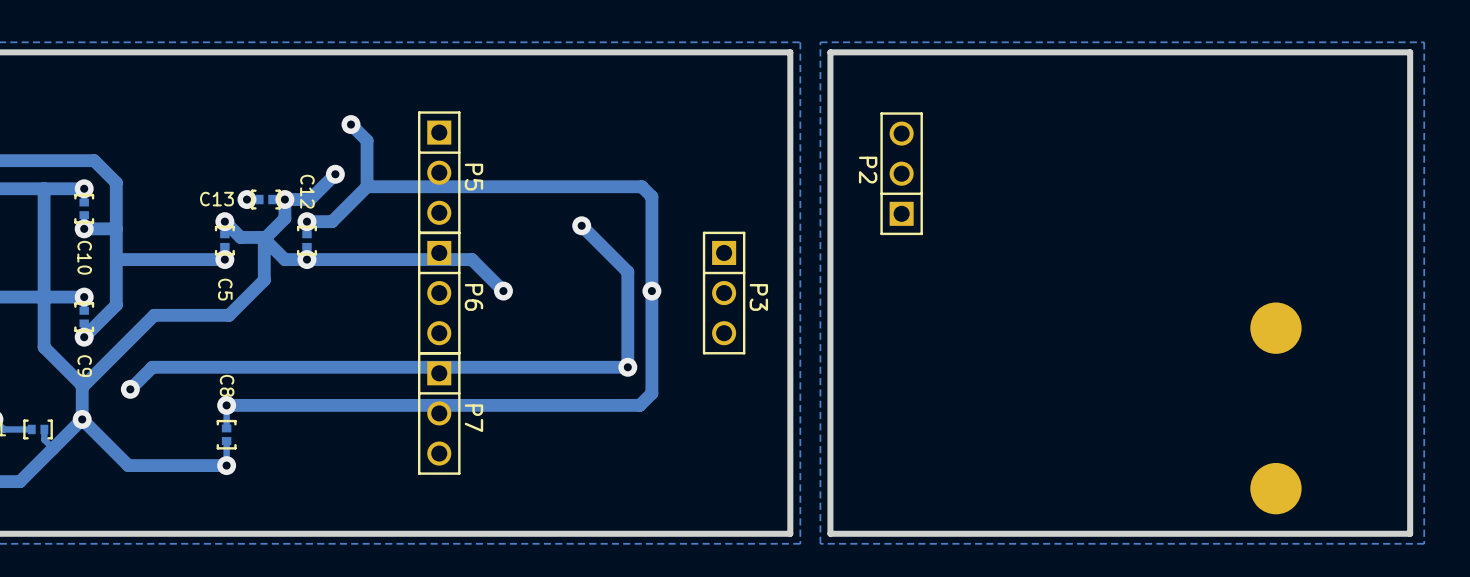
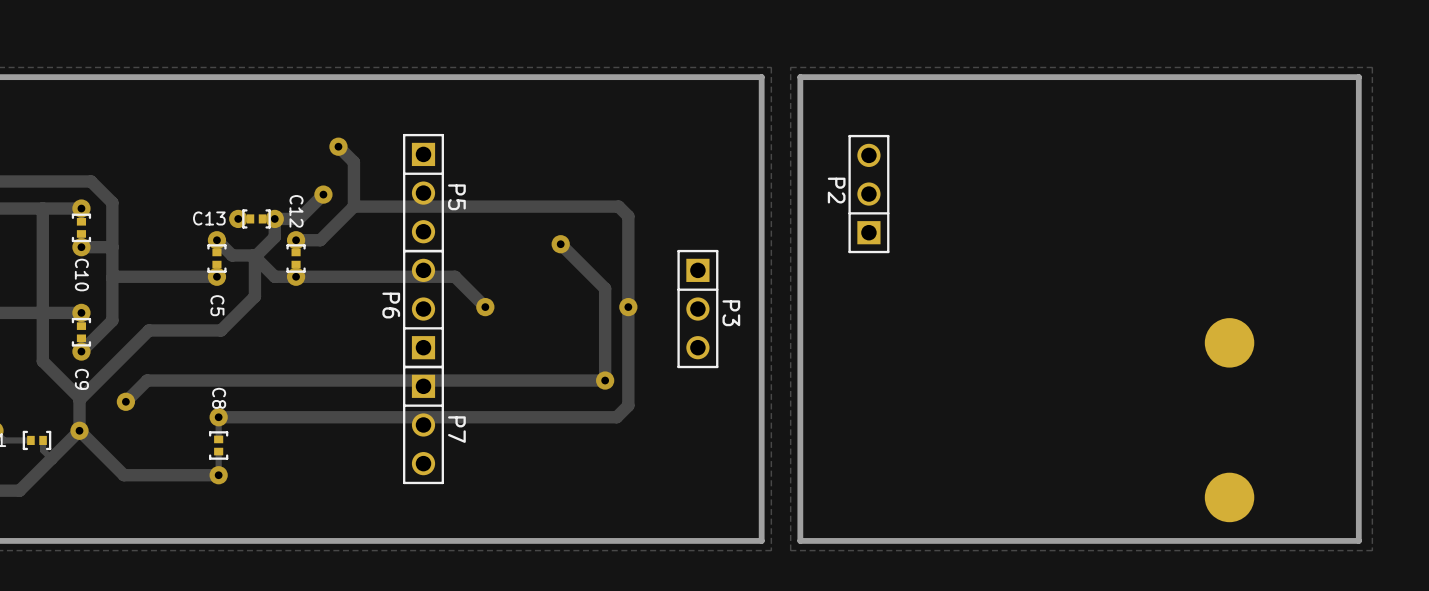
P6 rotation: 0° (439, 293) -> 180° (423, 309)

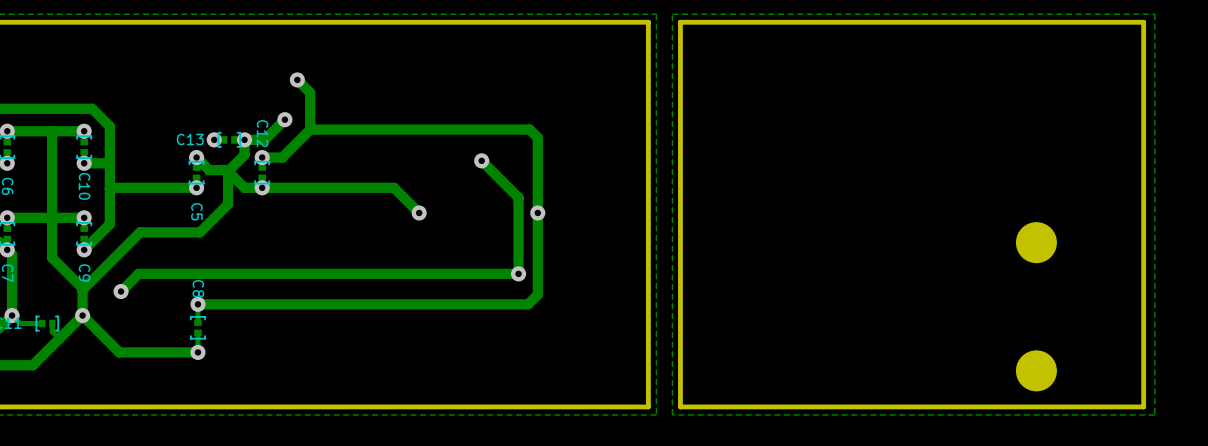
P5: (423, 193) -> none
P2: (868, 194) -> none
P6: (423, 309) -> none
P3: (697, 309) -> none
P7: (423, 424) -> none

